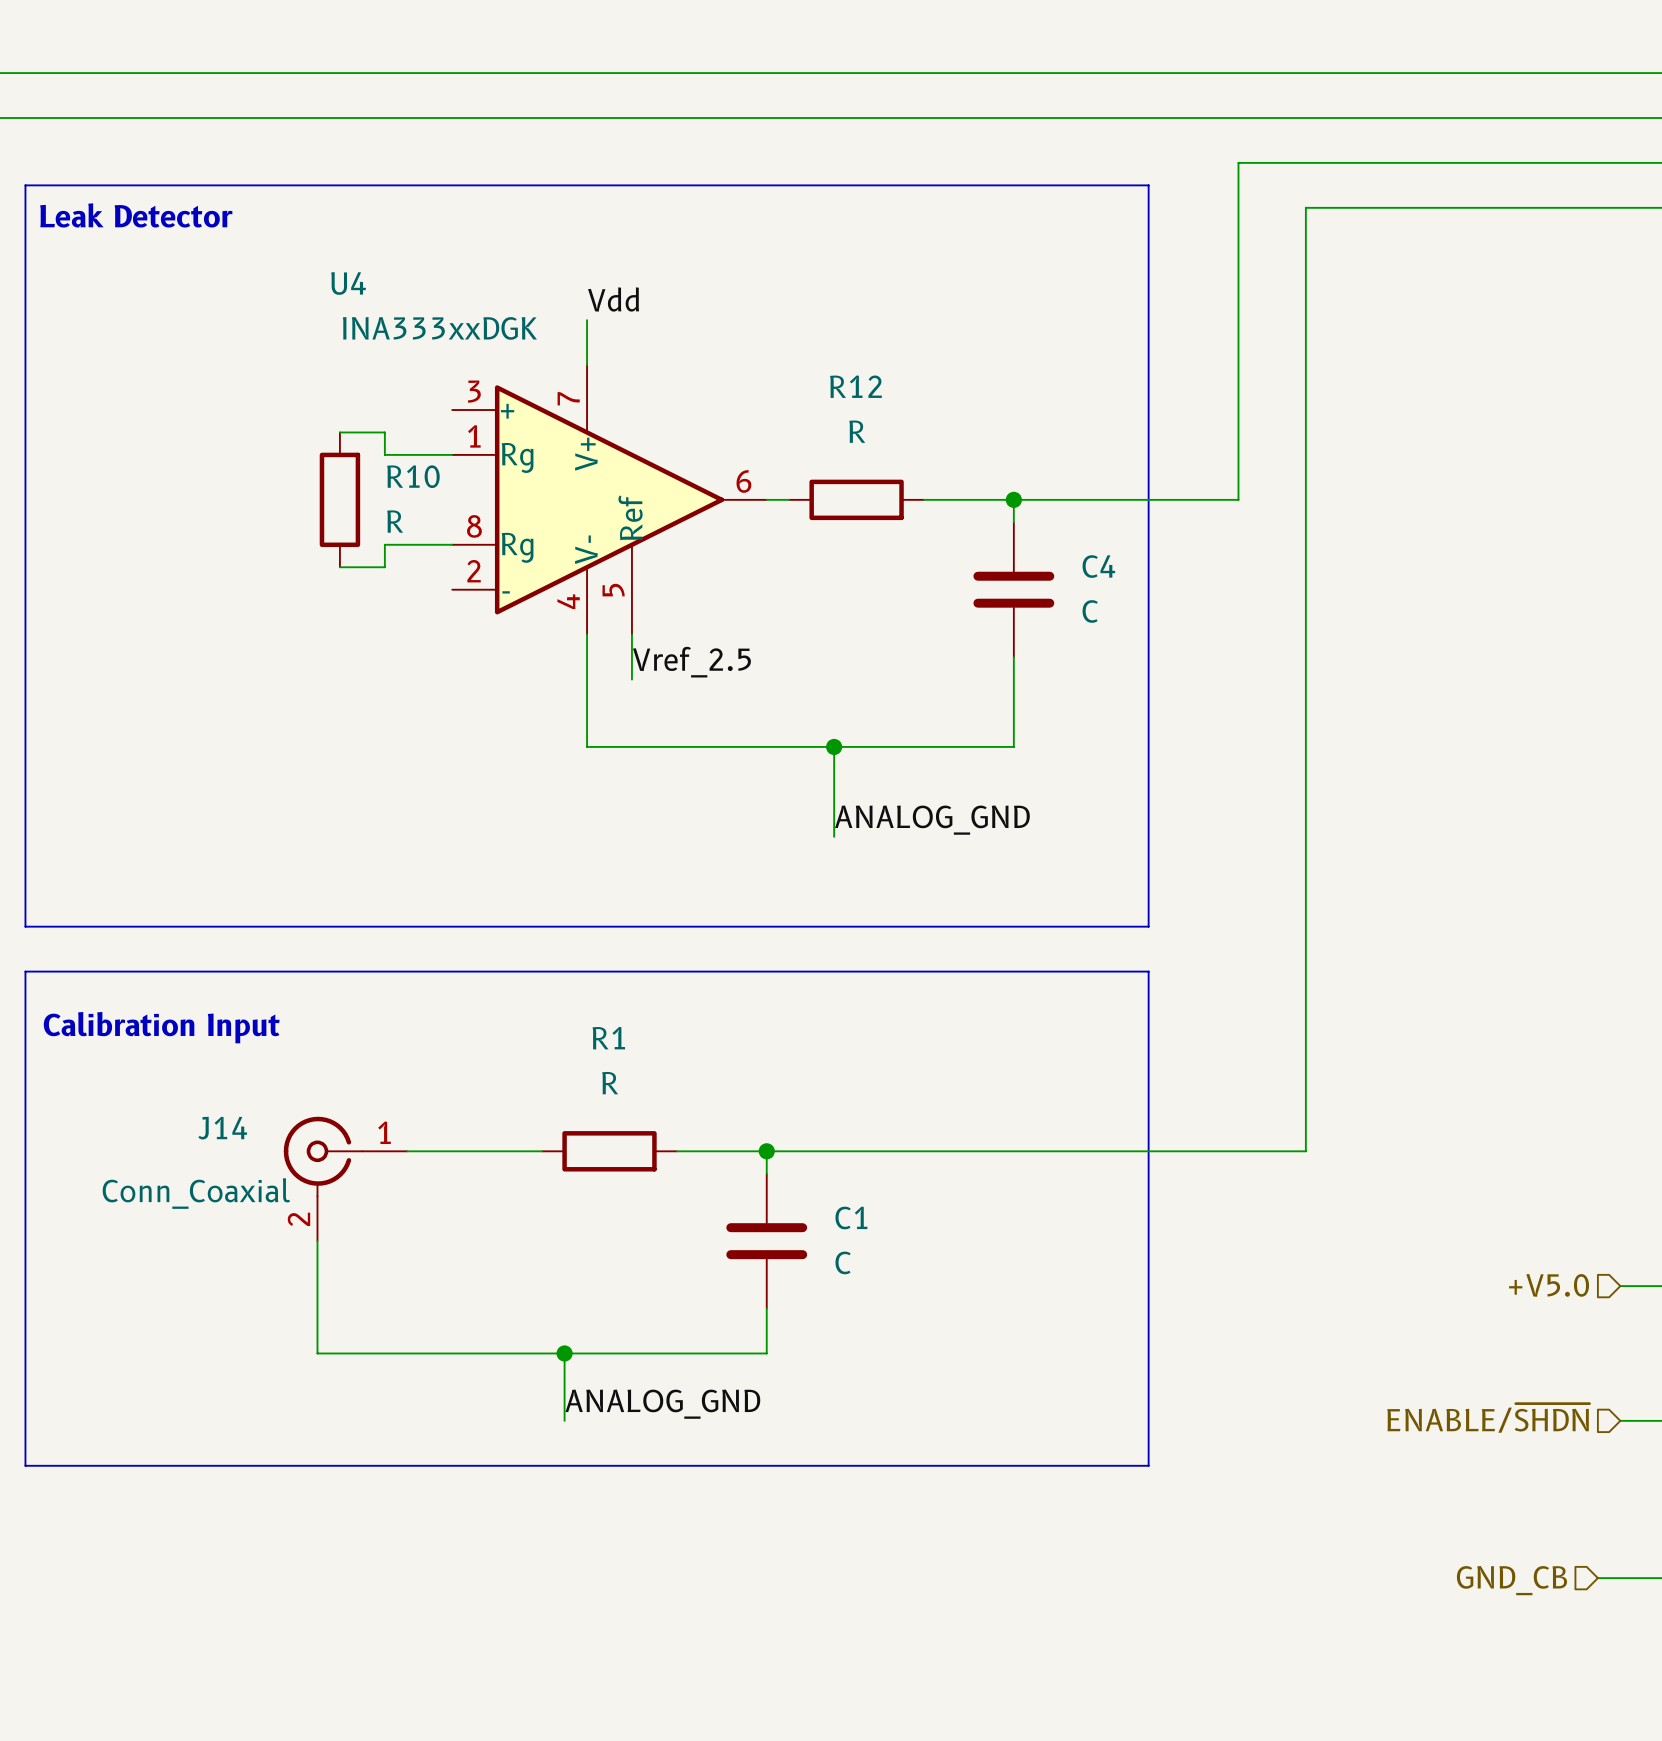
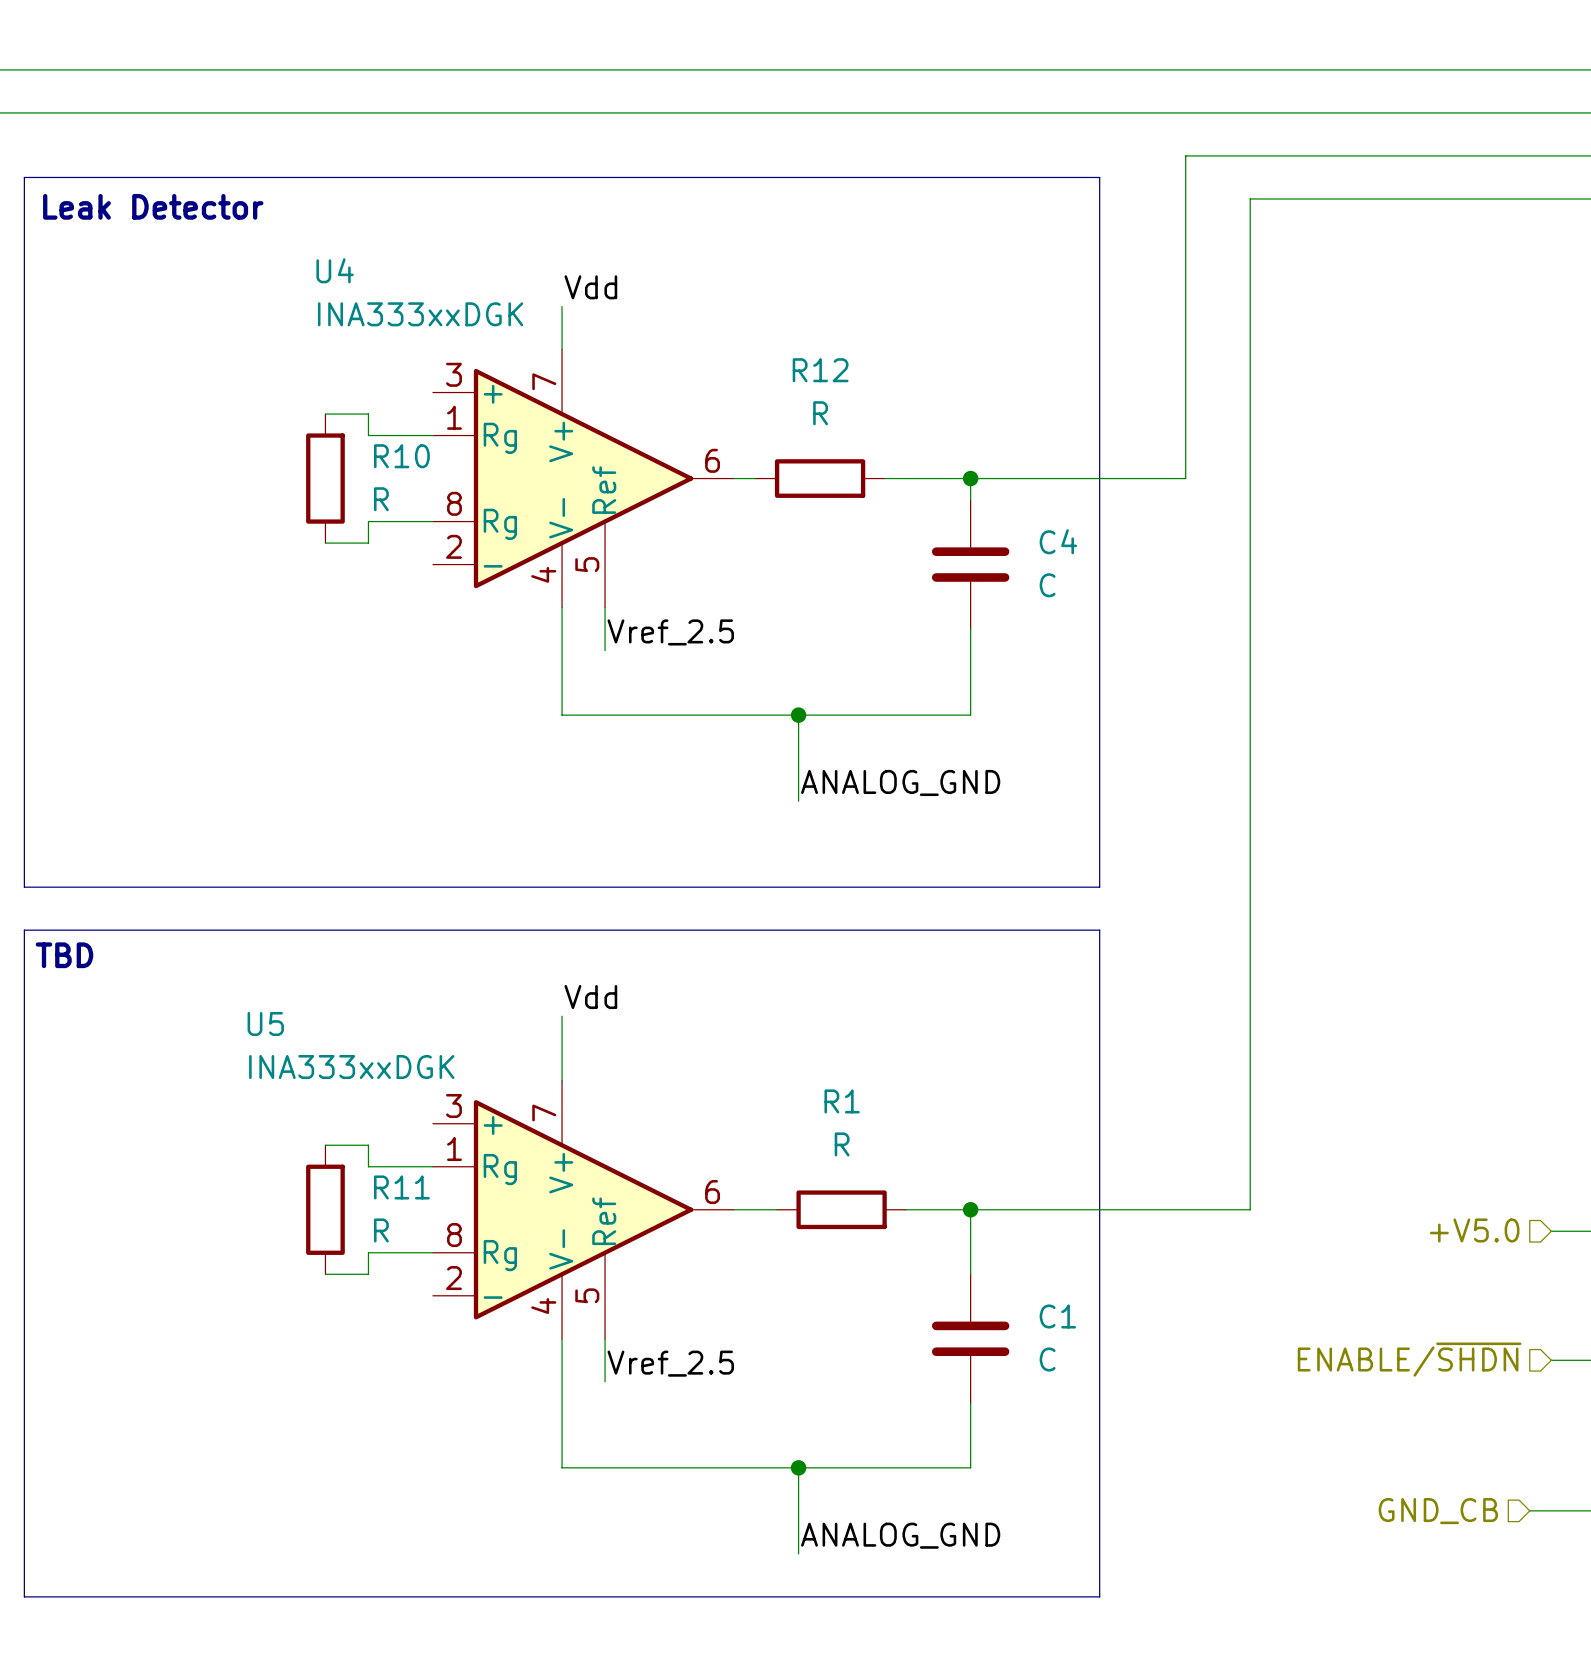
text: none -> TBD (64, 955)
text: Calibration Input (161, 1027) -> none
label: none -> Vdd (590, 997)
wire: (407, 1151) (542, 1151) -> none
R1 position: (609, 1151) -> (841, 1209)
wire: (676, 1151) (1305, 1151) -> (906, 1209) (1250, 1209) (1250, 1102)
wire: (766, 1151) (766, 1173) -> none
junction: (766, 1151) -> none
J14: Conn_Coaxial (345, 1178) -> none
wire: none -> (325, 1145) (368, 1145) (368, 1166) (432, 1166)
wire: (317, 1241) (317, 1353) (766, 1353) (766, 1308) -> none
C1 position: (766, 1241) -> (970, 1338)
R11: none -> R (325, 1209)
U5: none -> INA333xxDGK (583, 1209)
wire: none -> (734, 1209) (777, 1209)
wire: none -> (970, 1209) (970, 1274)
junction: none -> (970, 1209)
wire: none -> (432, 1252) (368, 1252) (368, 1274) (325, 1274)
wire: (564, 1353) (564, 1420) -> (562, 1016) (562, 1080)
junction: (564, 1353) -> none
wire: none -> (562, 1338) (562, 1467) (970, 1467) (970, 1403)
wire: none -> (605, 1338) (605, 1381)
label position: ANALOG_GND (662, 1404) -> ANALOG_GND (900, 1535)
label: none -> Vref_2.5 (670, 1363)
line: (25, 1465) (1148, 1465) -> (24, 1403) (24, 1596) (1099, 1596) (1099, 1403)
wire: none -> (798, 1467) (798, 1553)
junction: none -> (798, 1467)

